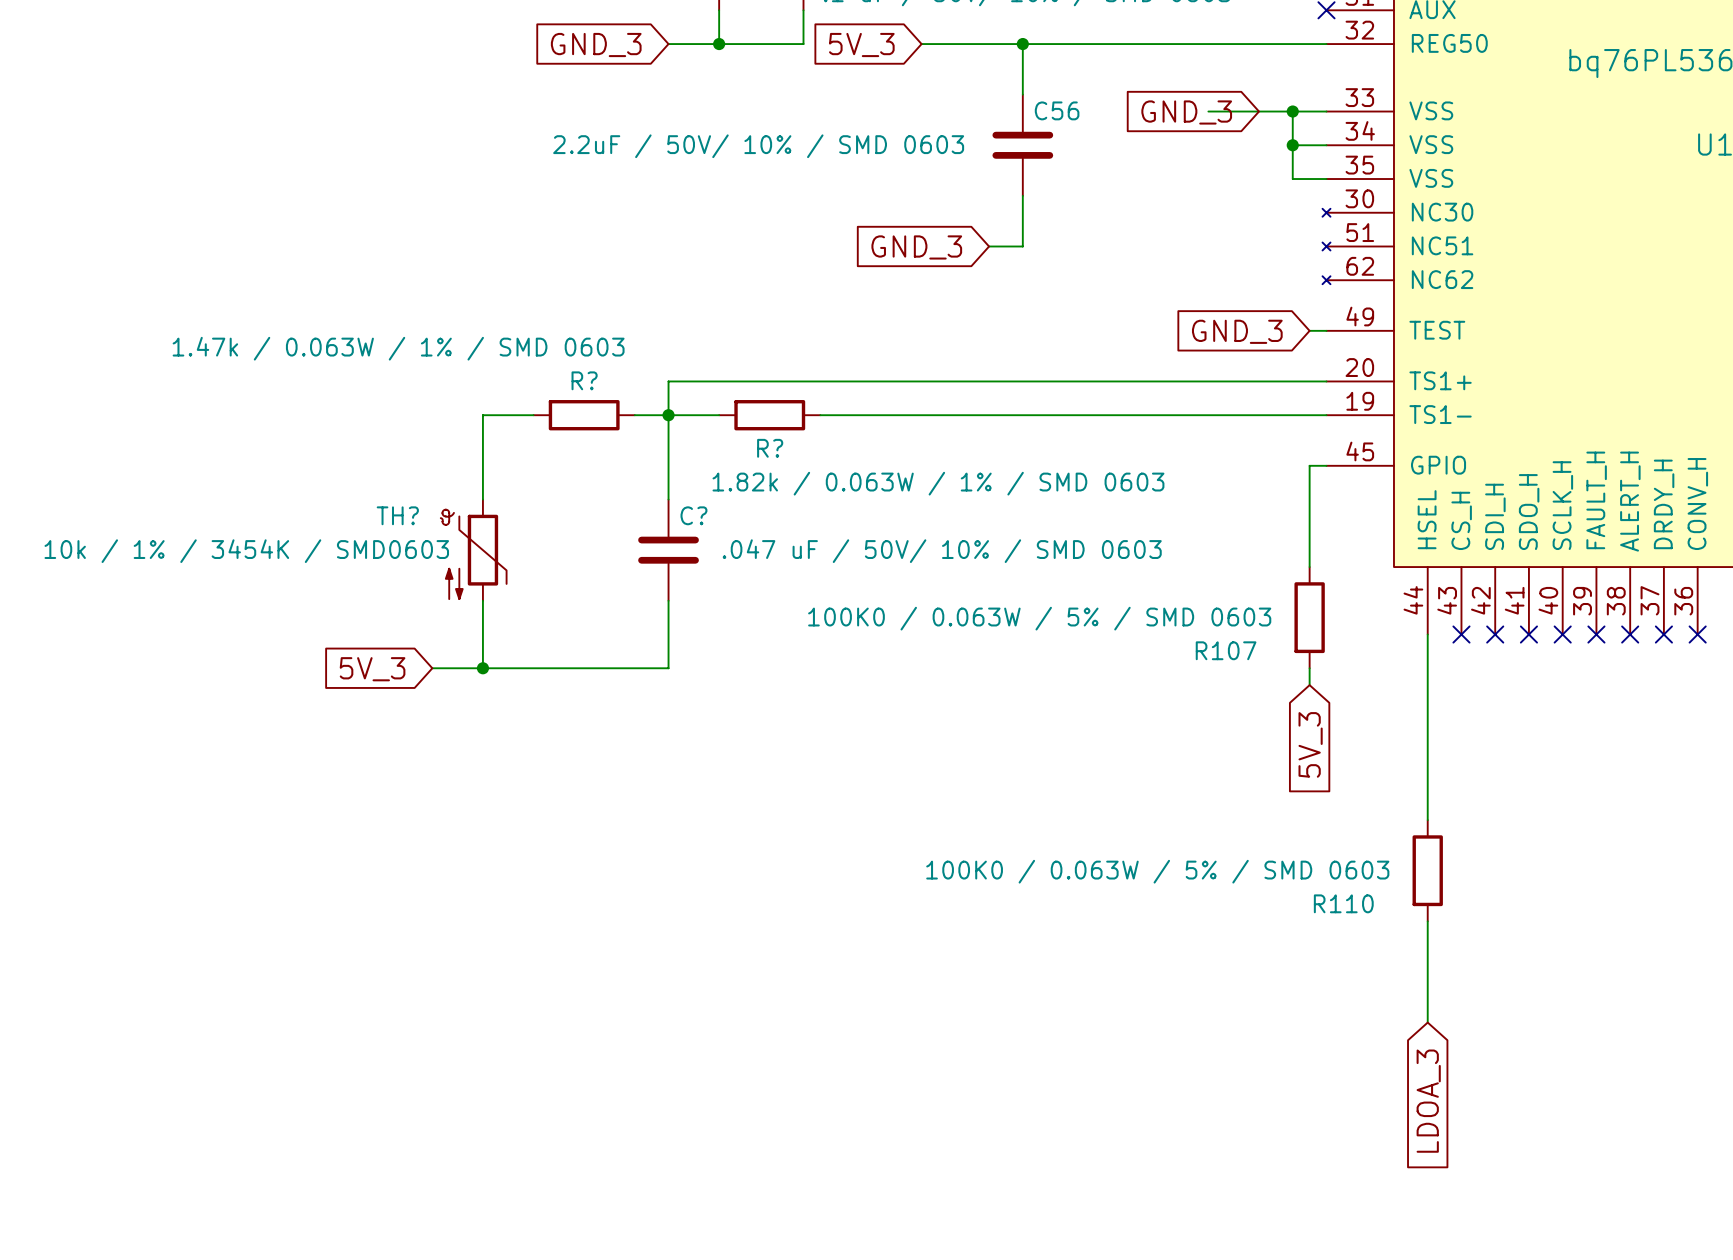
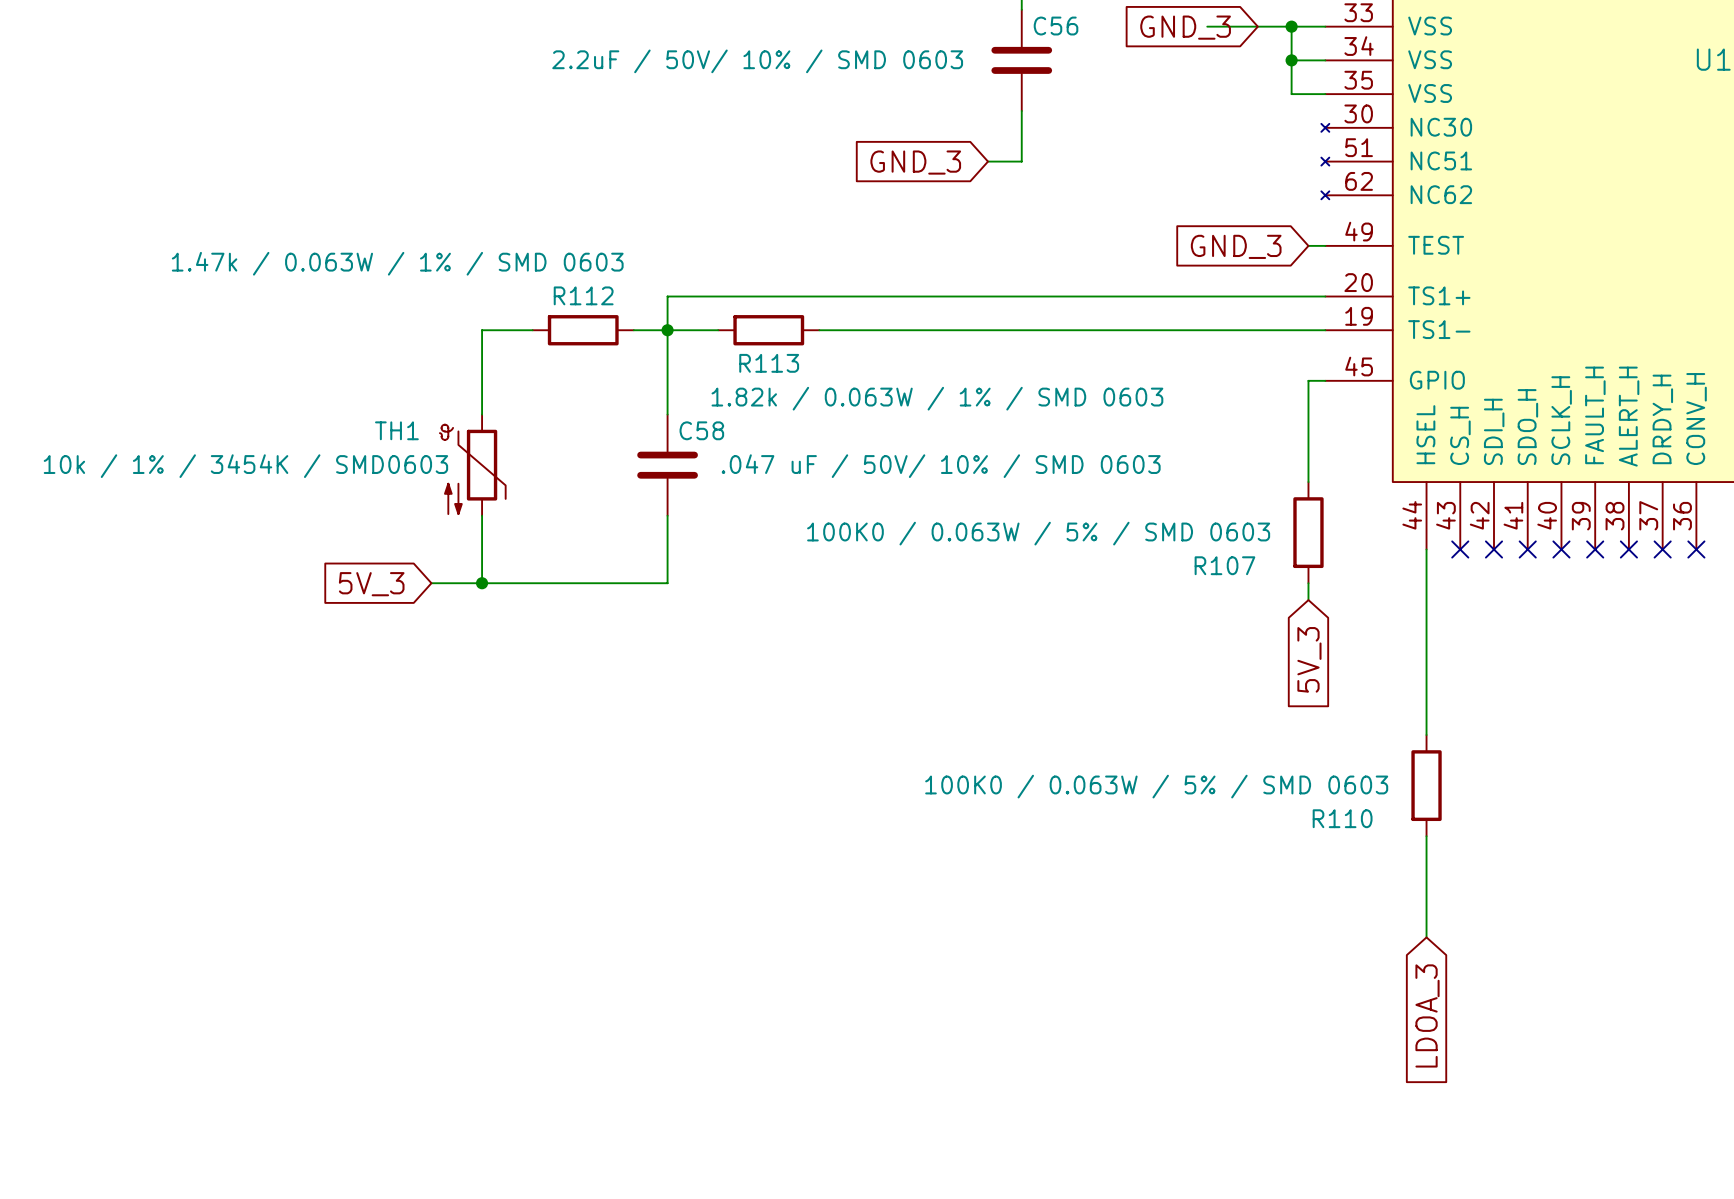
R? name: R? (584, 380) -> R112 (583, 295)
R? name: R? (770, 448) -> R113 (769, 363)
TH? name: TH? (397, 515) -> TH1 (396, 430)
C? name: C? (693, 515) -> C58 (701, 430)

